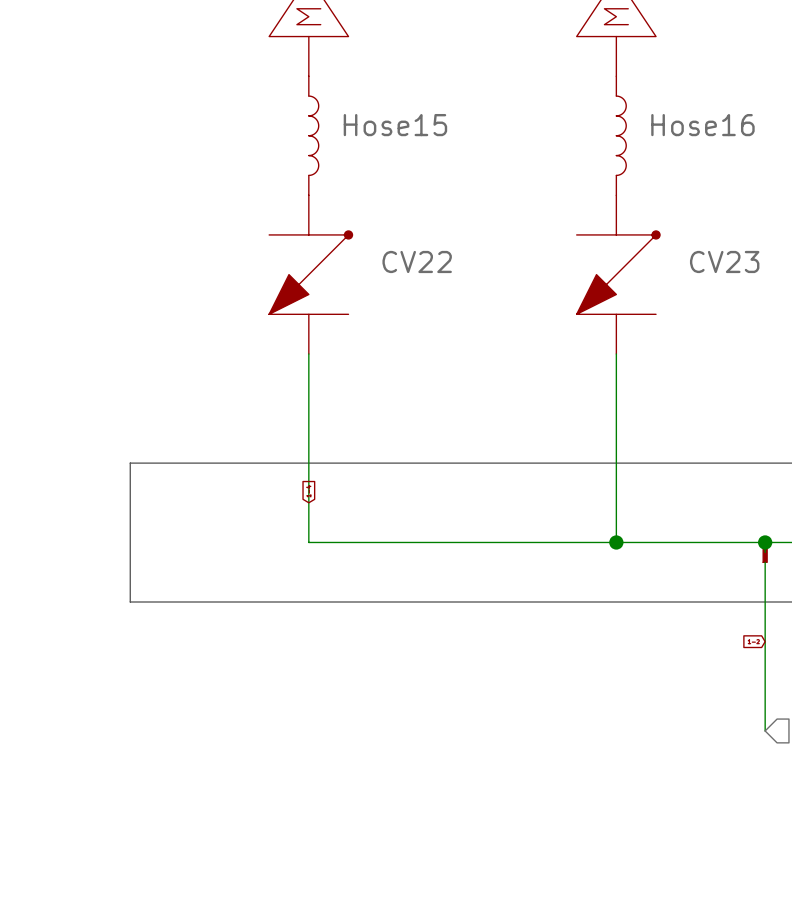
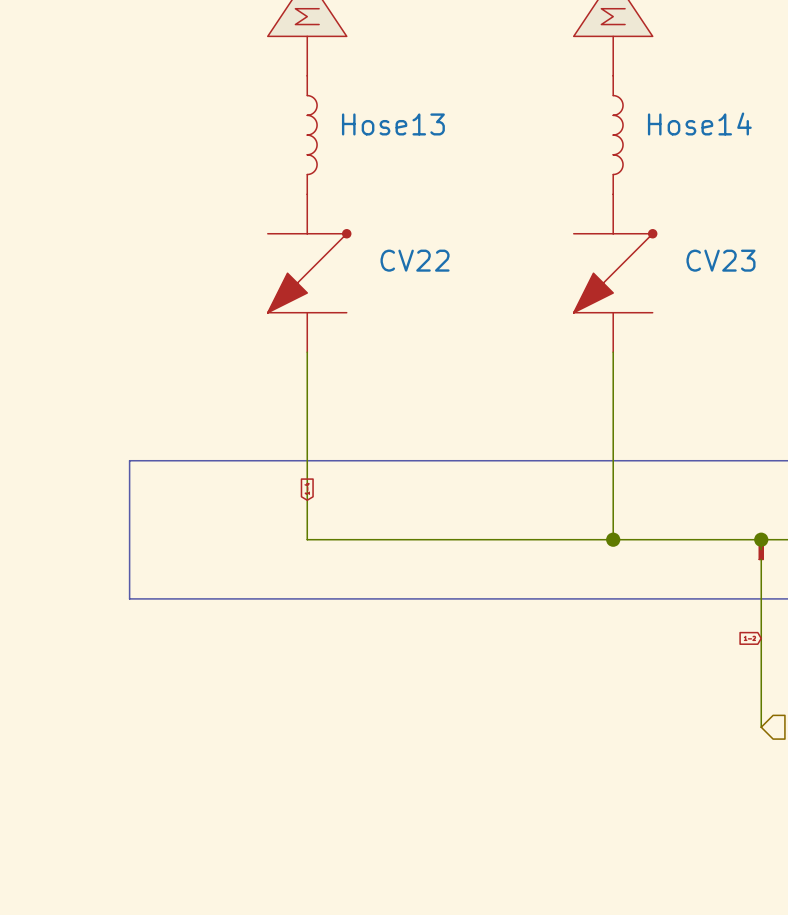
Hose15 name: Hose15 (395, 125) -> Hose13 (393, 124)
Hose16 name: Hose16 (702, 125) -> Hose14 (699, 123)

